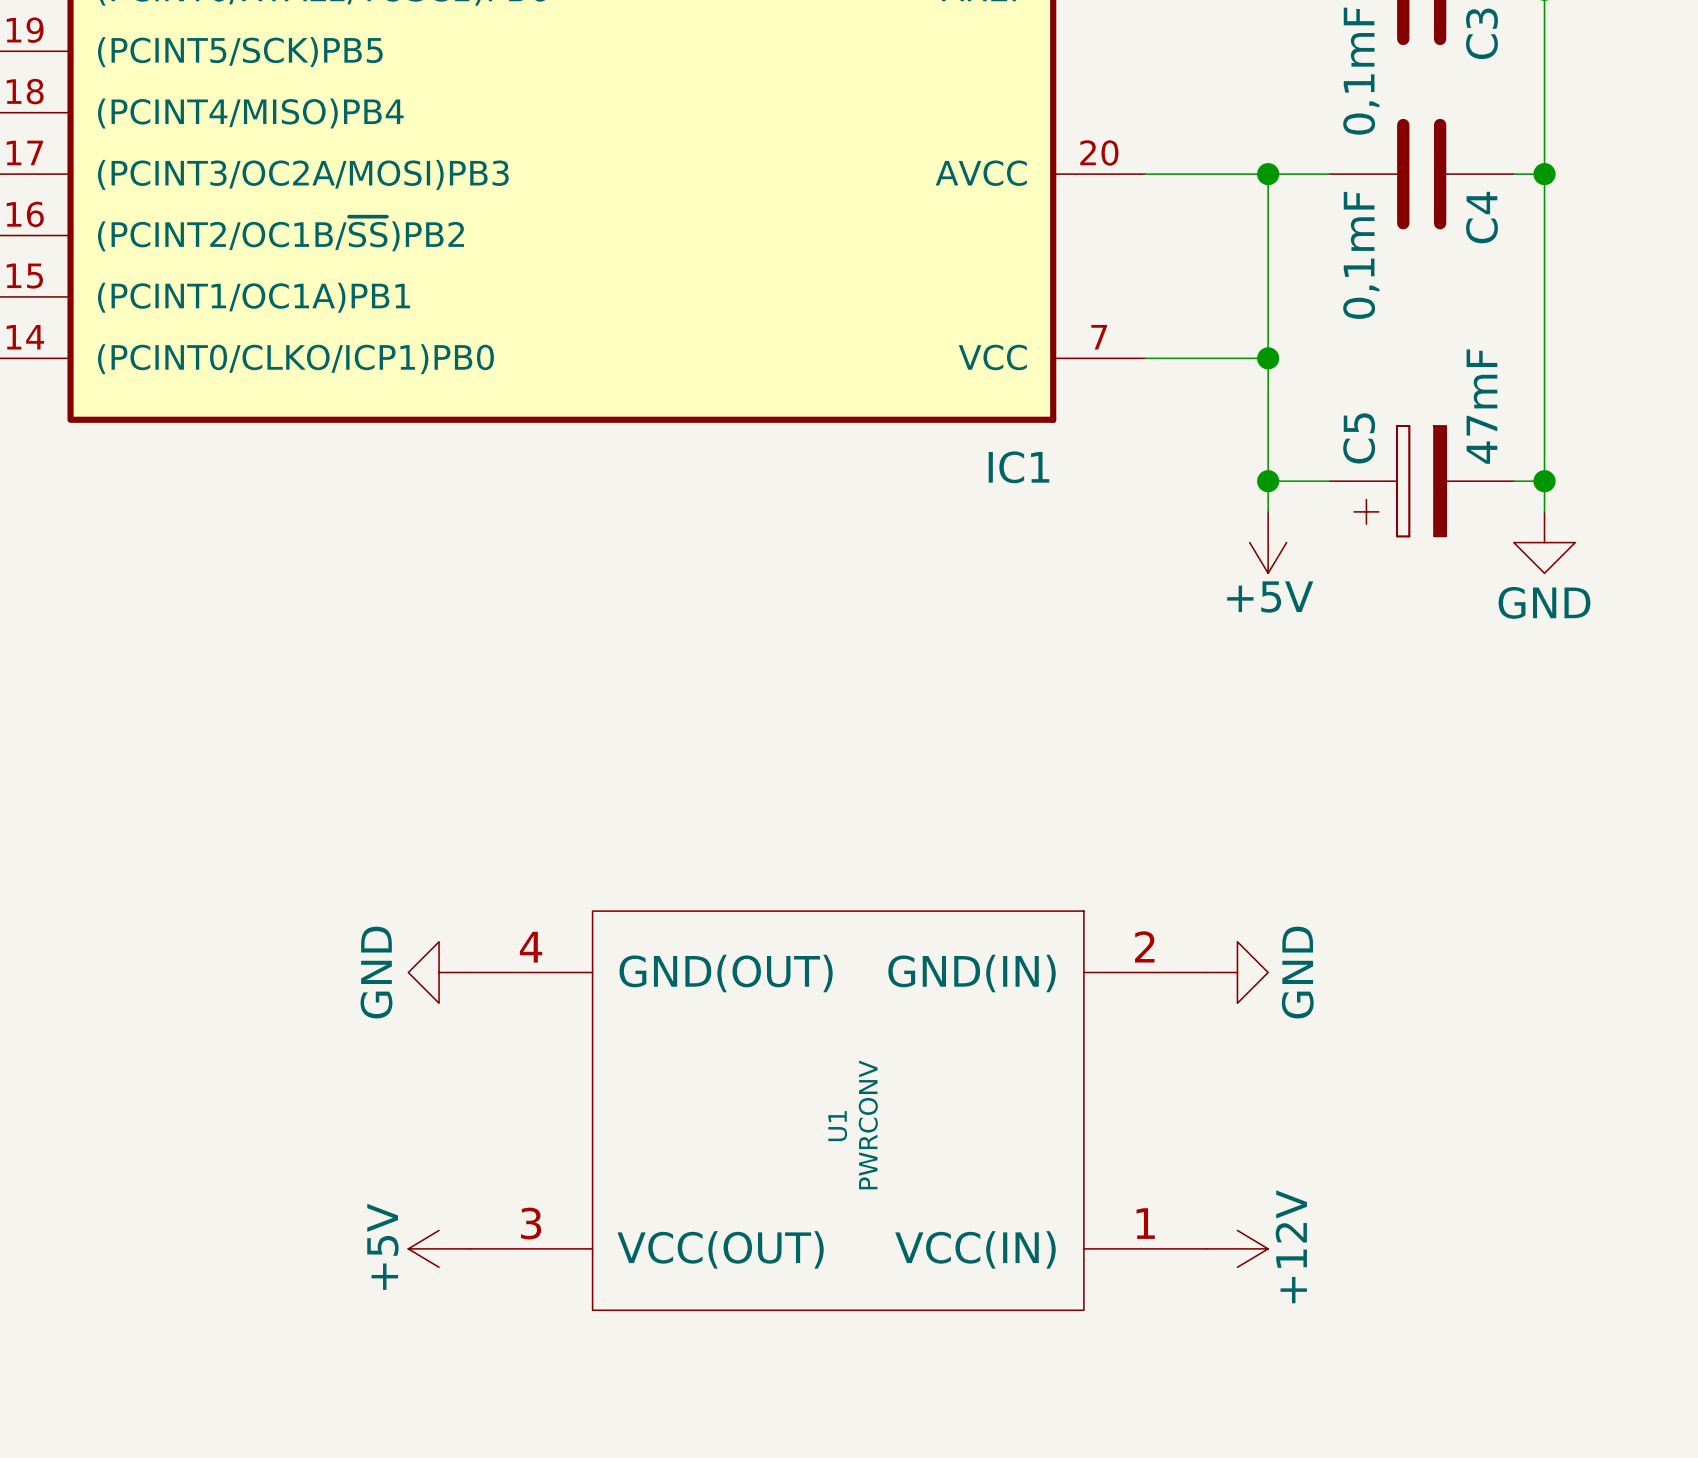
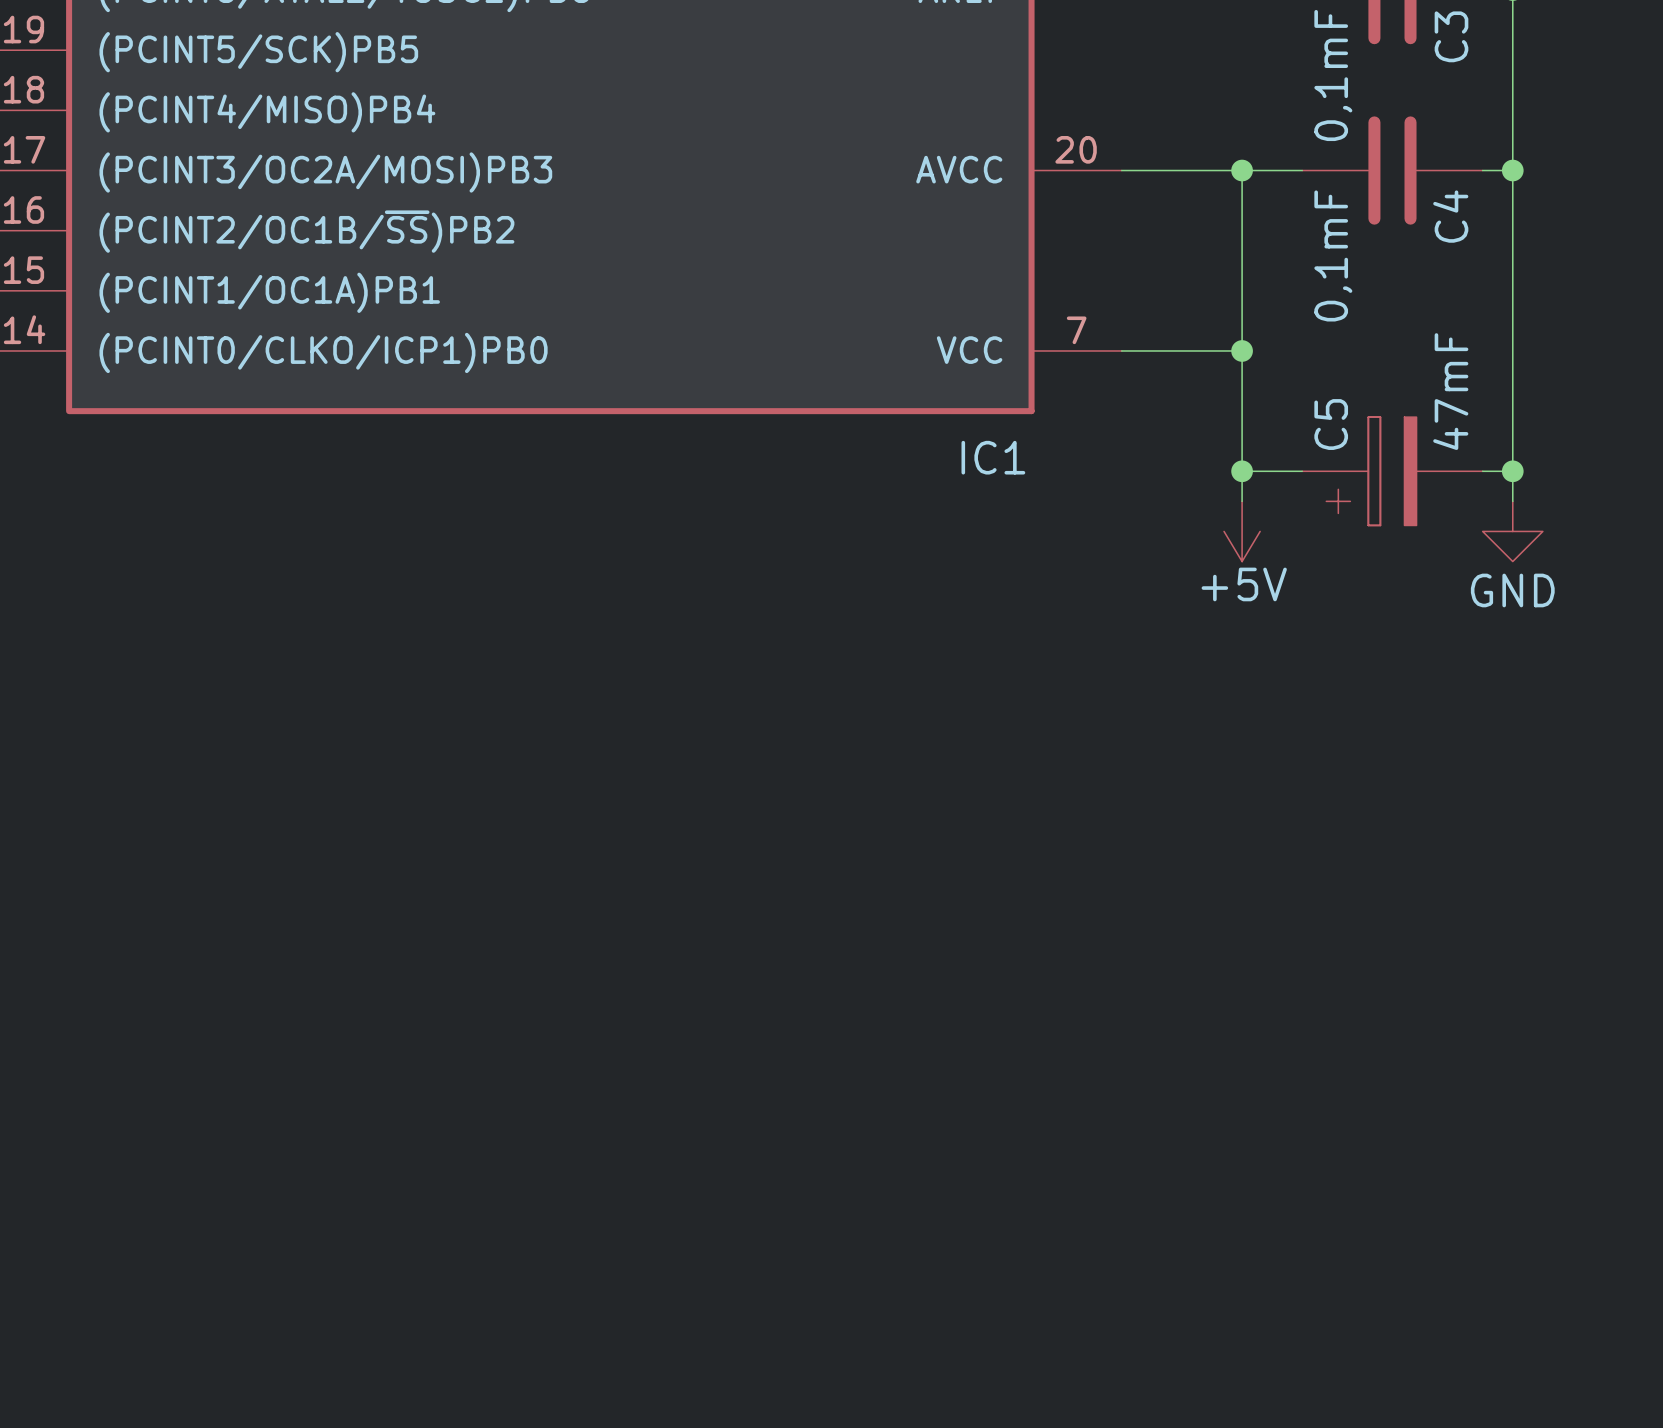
power symbol: GND (439, 972) -> none
power symbol: GND (1237, 972) -> none
U1: PWRCONV (838, 1110) -> none
power symbol: +5V (439, 1248) -> none
power symbol: +12V (1237, 1248) -> none

